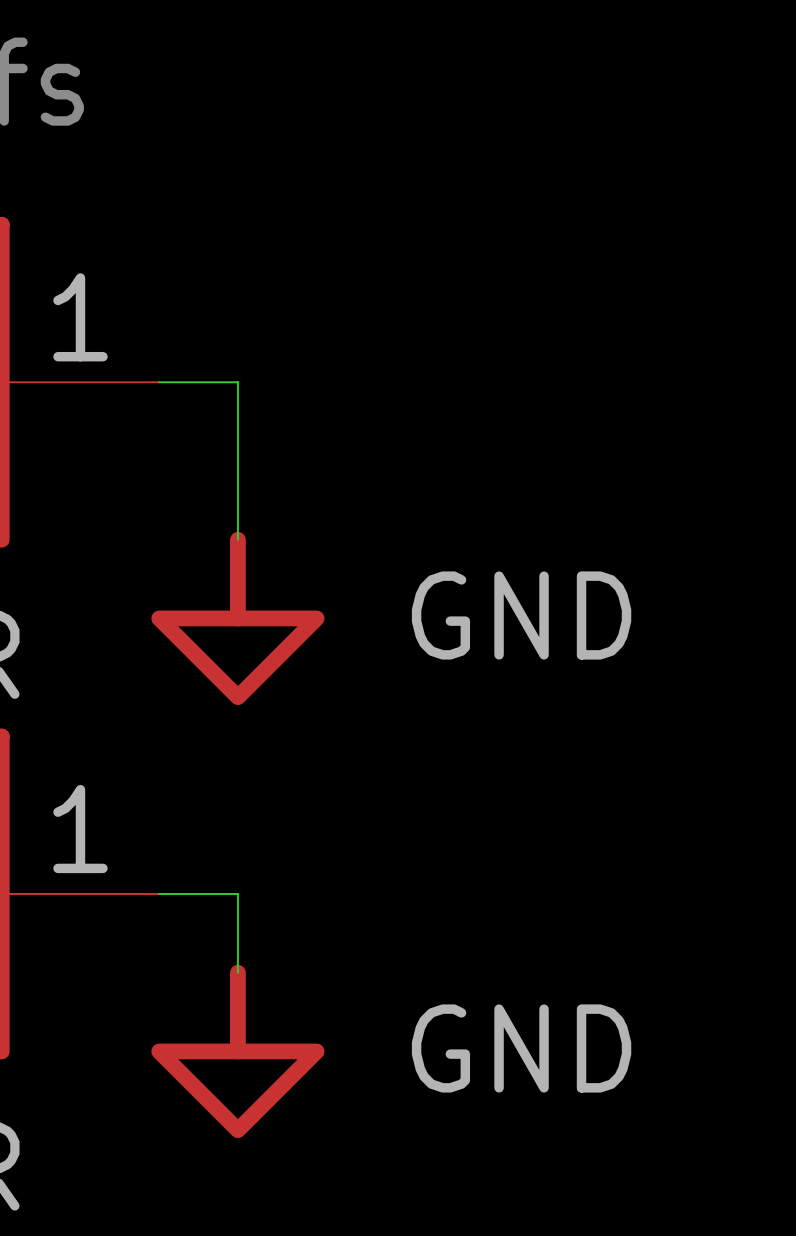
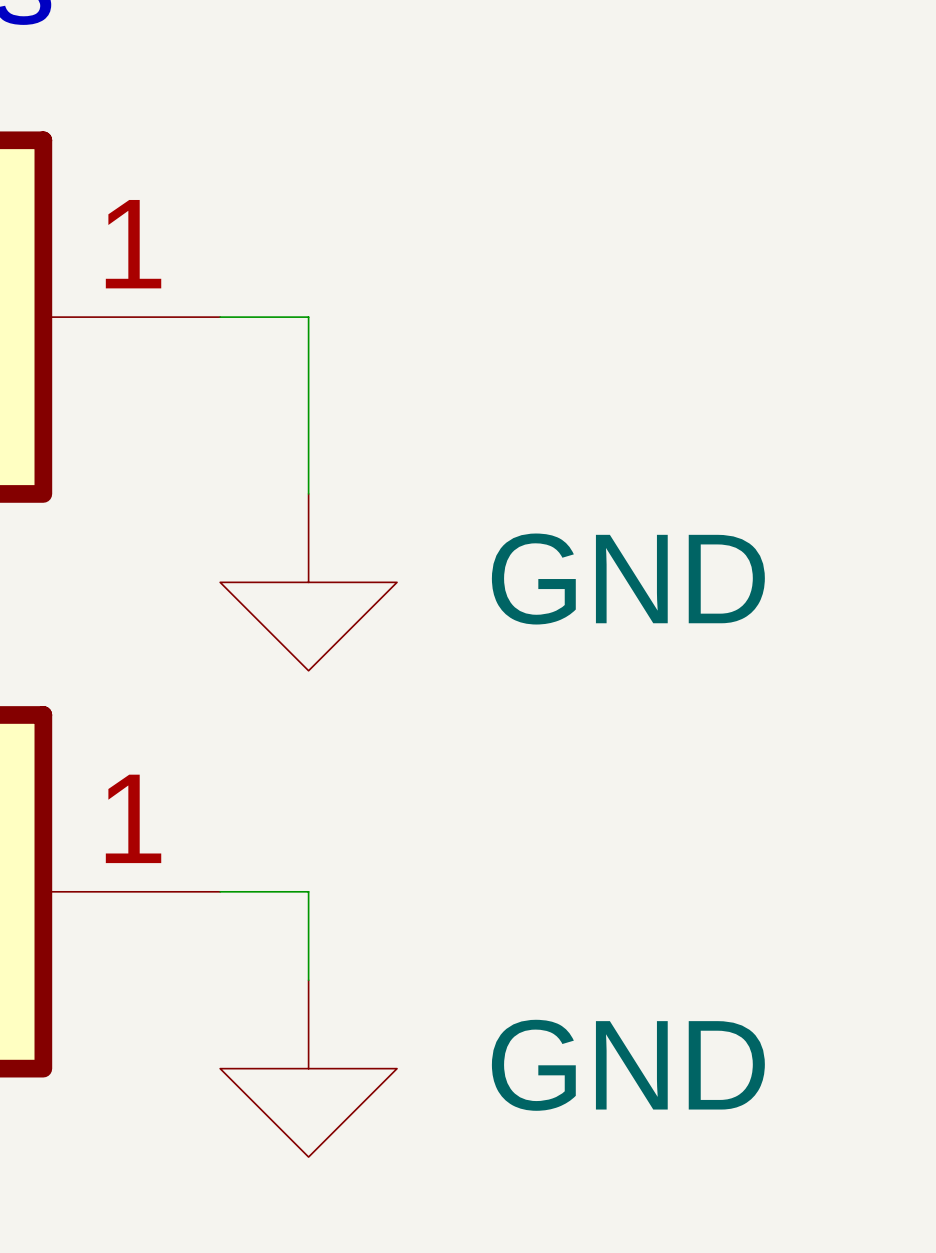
power symbol shape: [151, 531, 325, 706] -> [220, 493, 398, 671]
power symbol shape: [151, 964, 325, 1139] -> [220, 980, 398, 1158]

